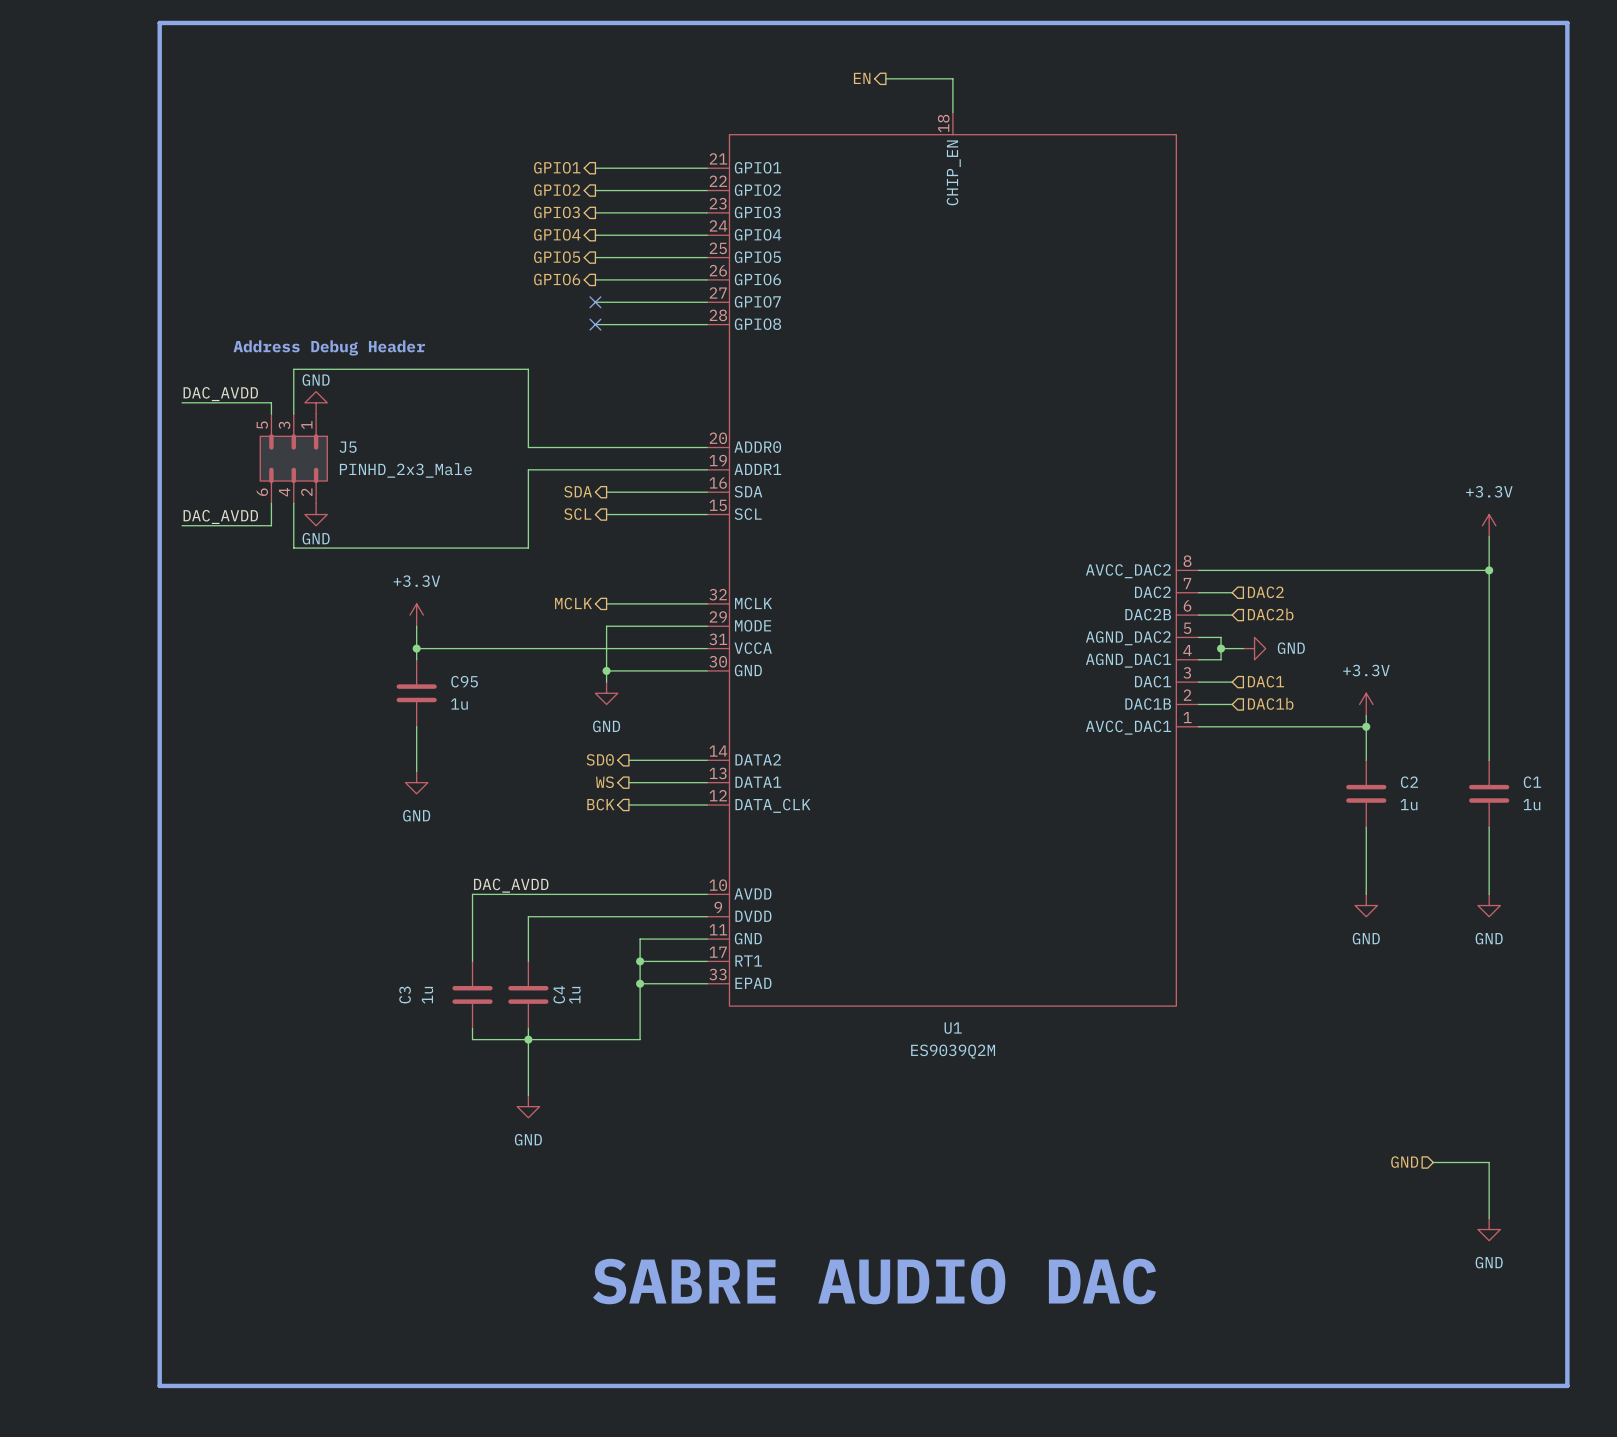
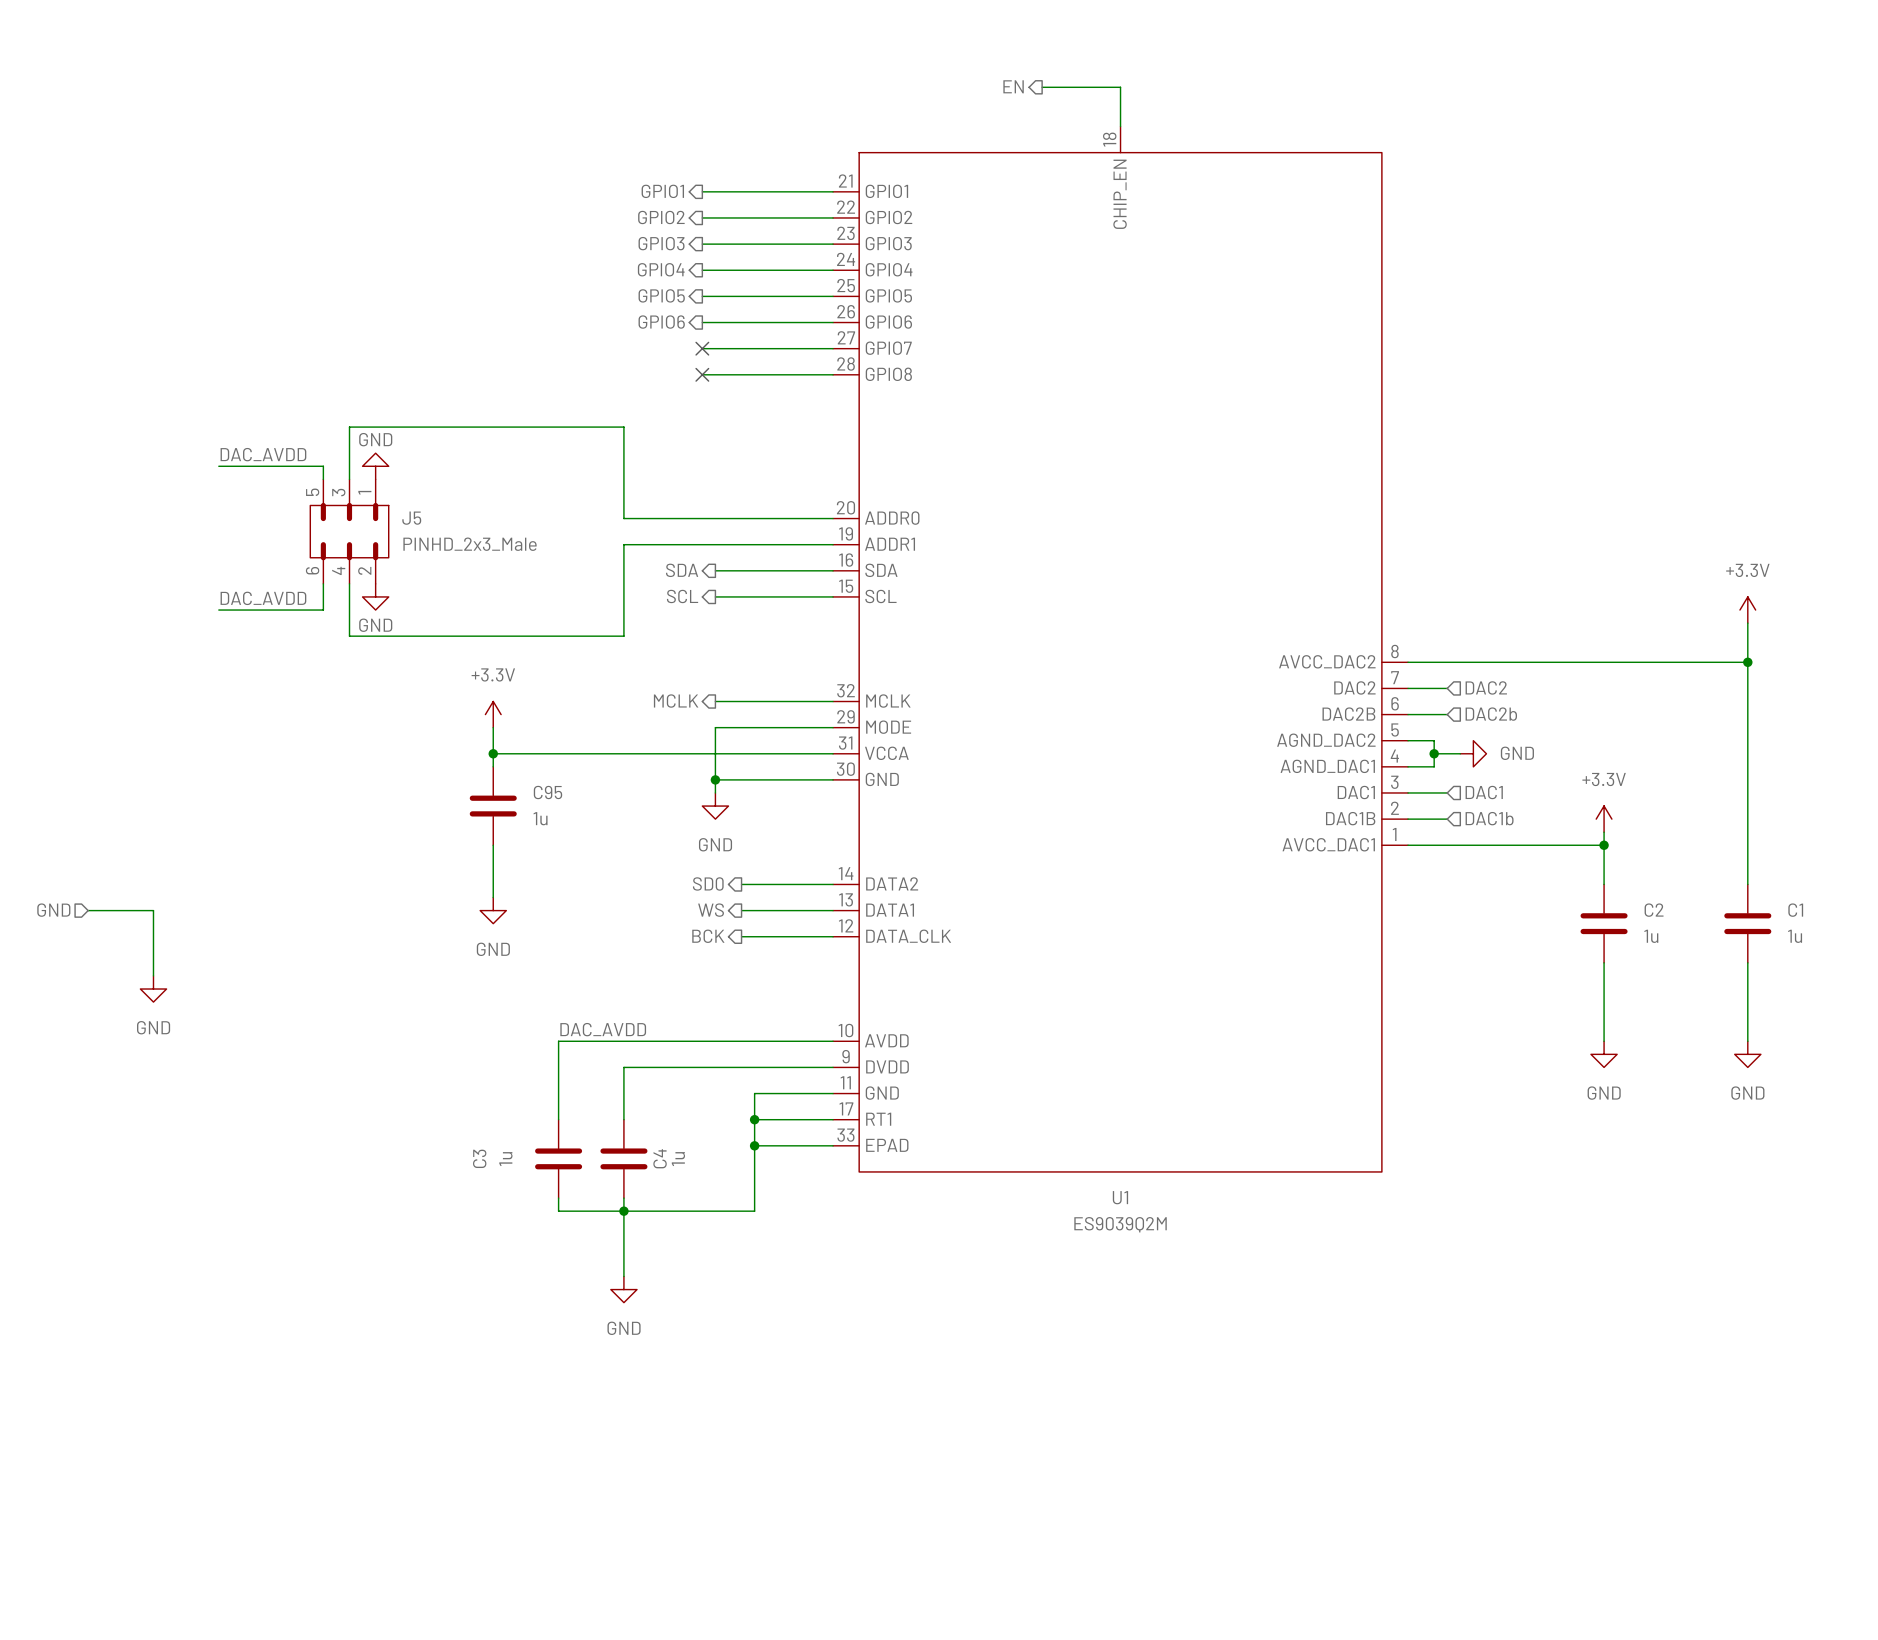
line: (159, 22) (1567, 22) (1567, 1385) (159, 1385) (159, 22) -> none
text: Address Debug Header (329, 347) -> none
hierarchical label: none -> GND (53, 910)
wire: none -> (88, 910) (153, 910) (153, 975)
power symbol: none -> GND (153, 989)
hierarchical label: GND (1404, 1162) -> none
wire: (1433, 1162) (1489, 1162) (1489, 1218) -> none
power symbol: GND (1489, 1229) -> none
text: SABRE AUDIO DAC (874, 1281) -> none

